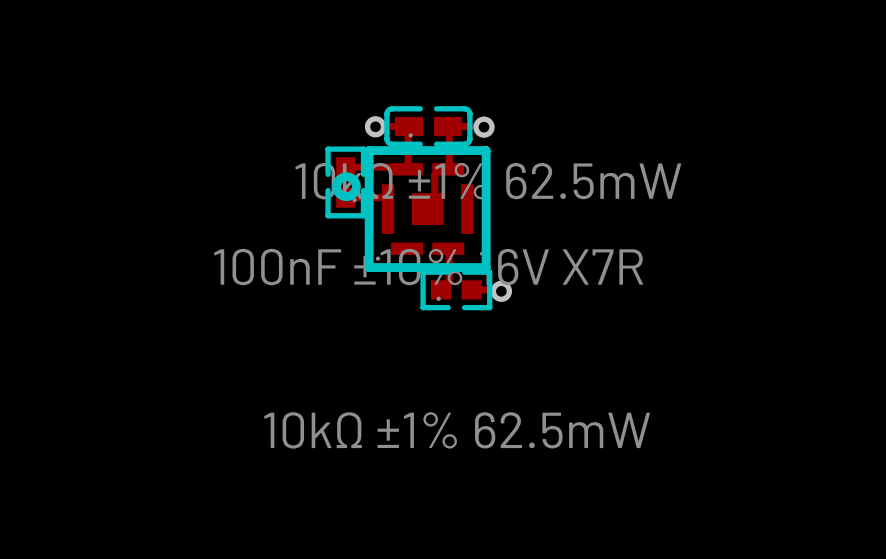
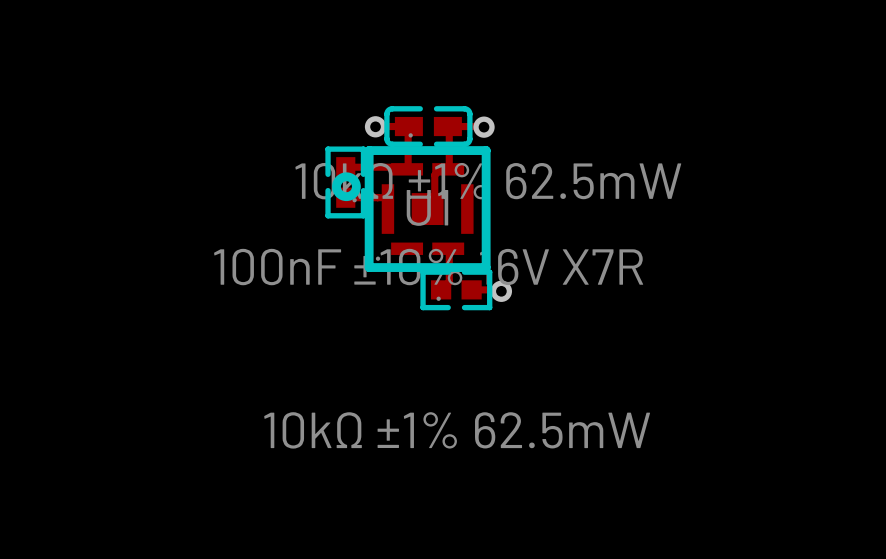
U1 name: none -> U1 (427, 207)

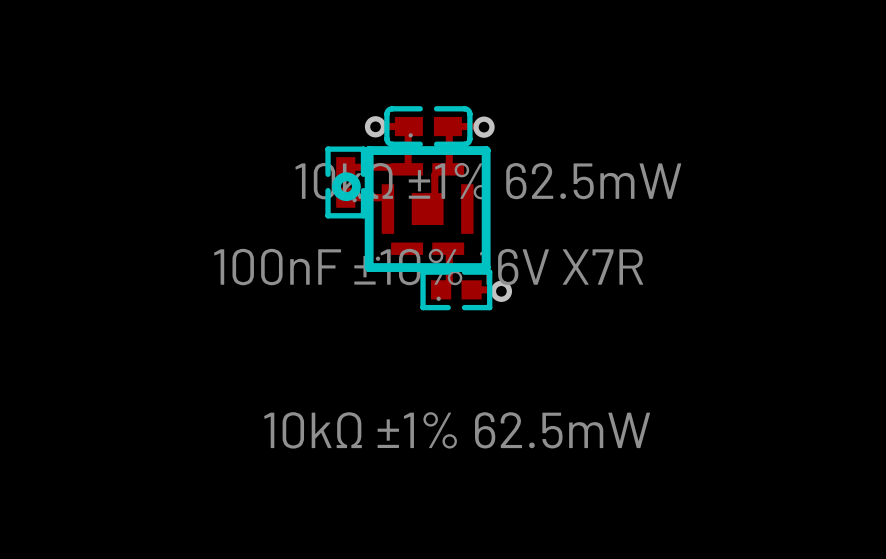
U1 name: U1 (427, 207) -> none

